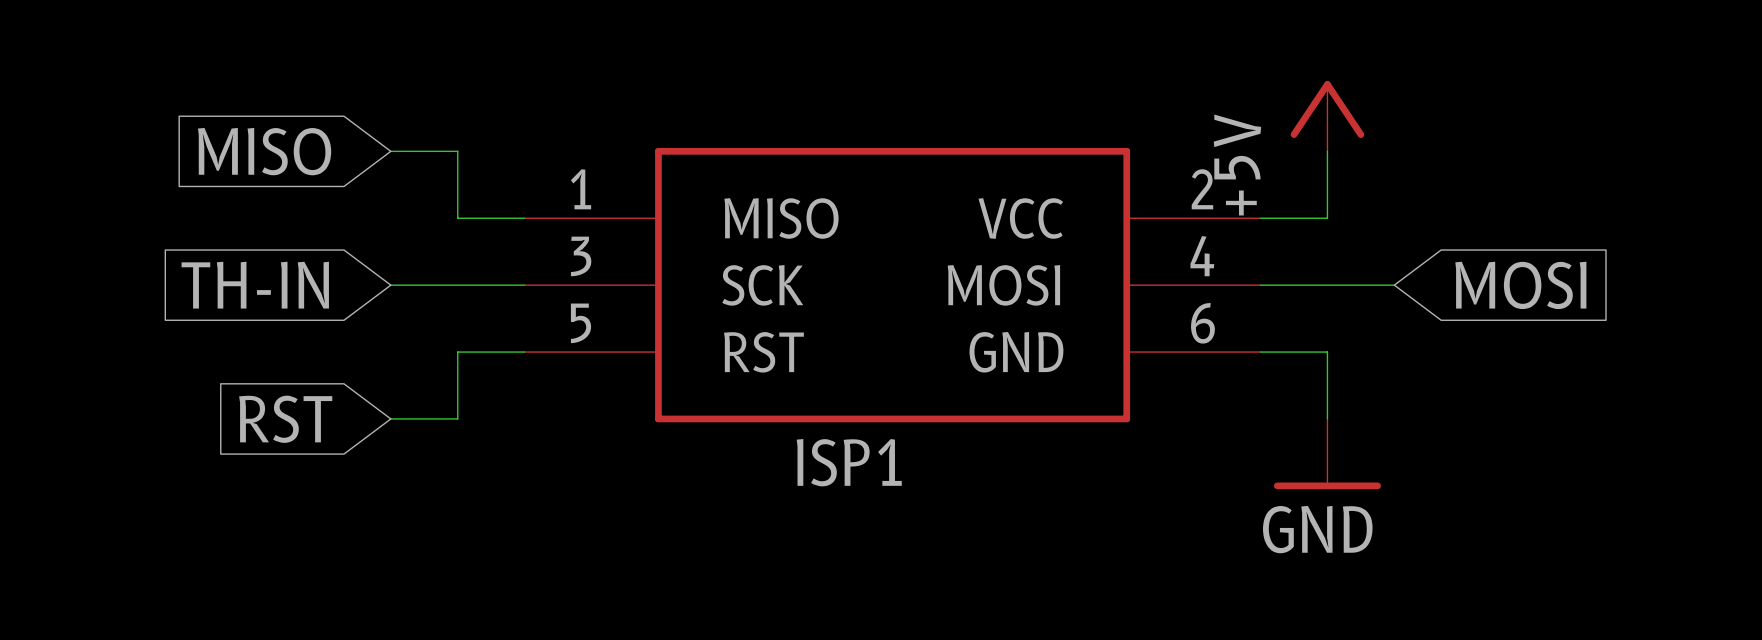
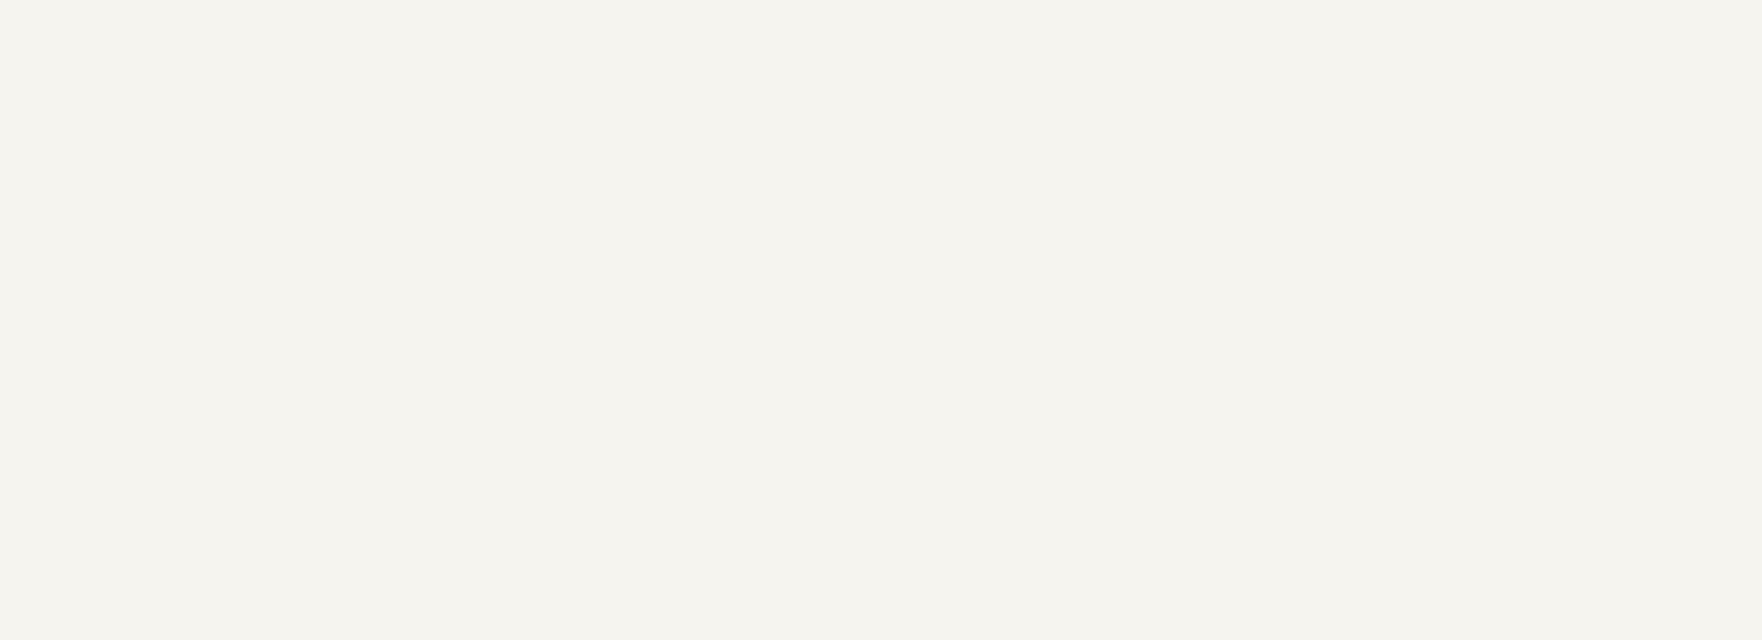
power symbol: +5V (1327, 116) -> none
global label: MISO (264, 151) -> none
wire: (390, 151) (457, 151) (457, 218) (524, 218) -> none
wire: (1327, 151) (1327, 218) (1260, 218) -> none
global label: TH-IN (255, 285) -> none
wire: (390, 285) (524, 285) -> none
ISP1: (892, 285) -> none
wire: (1260, 285) (1394, 285) -> none
global label: MOSI (1520, 285) -> none
wire: (524, 352) (457, 352) (457, 418) (390, 418) -> none
wire: (1260, 352) (1327, 352) (1327, 418) -> none
global label: RST (285, 419) -> none
power symbol: GND (1327, 454) -> none

